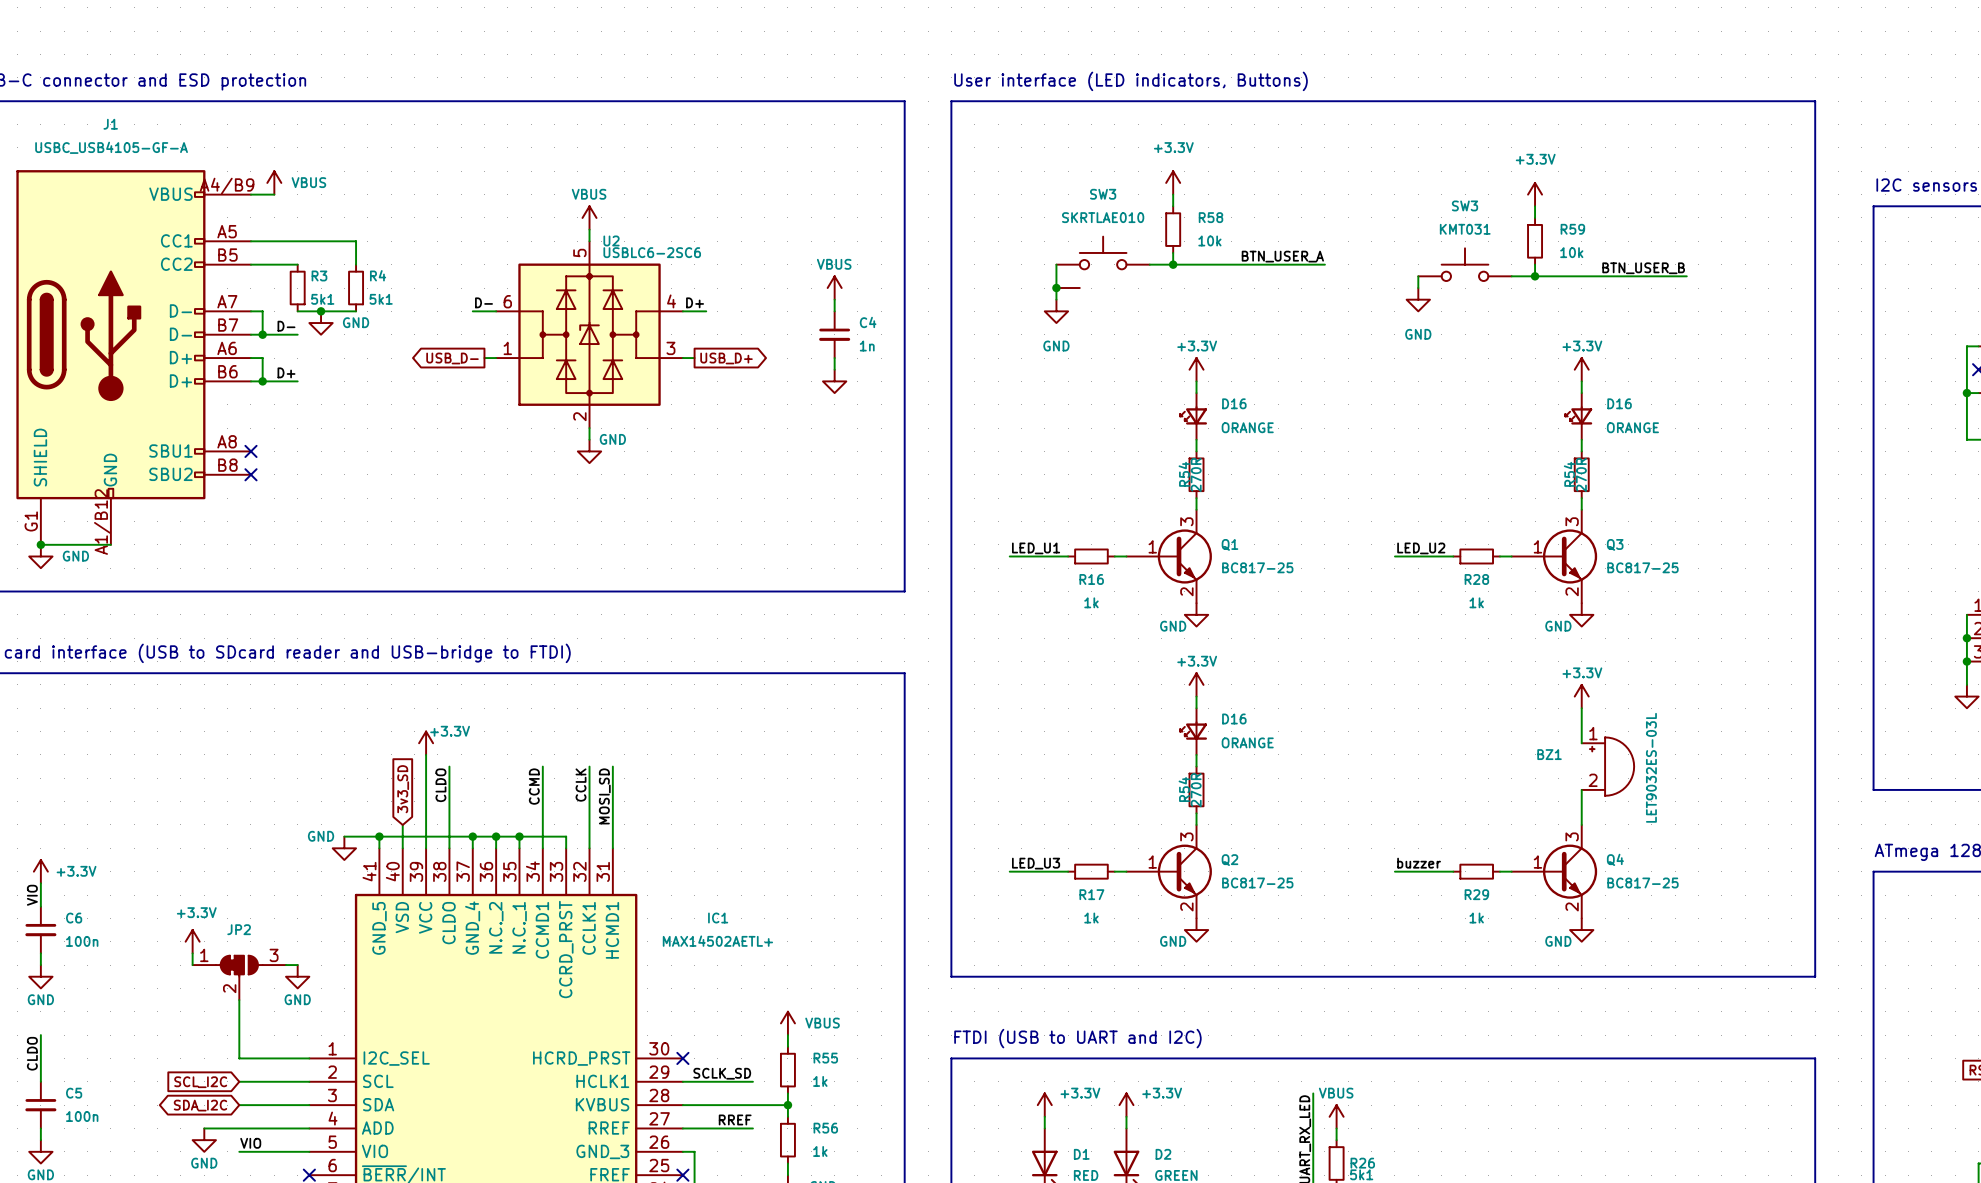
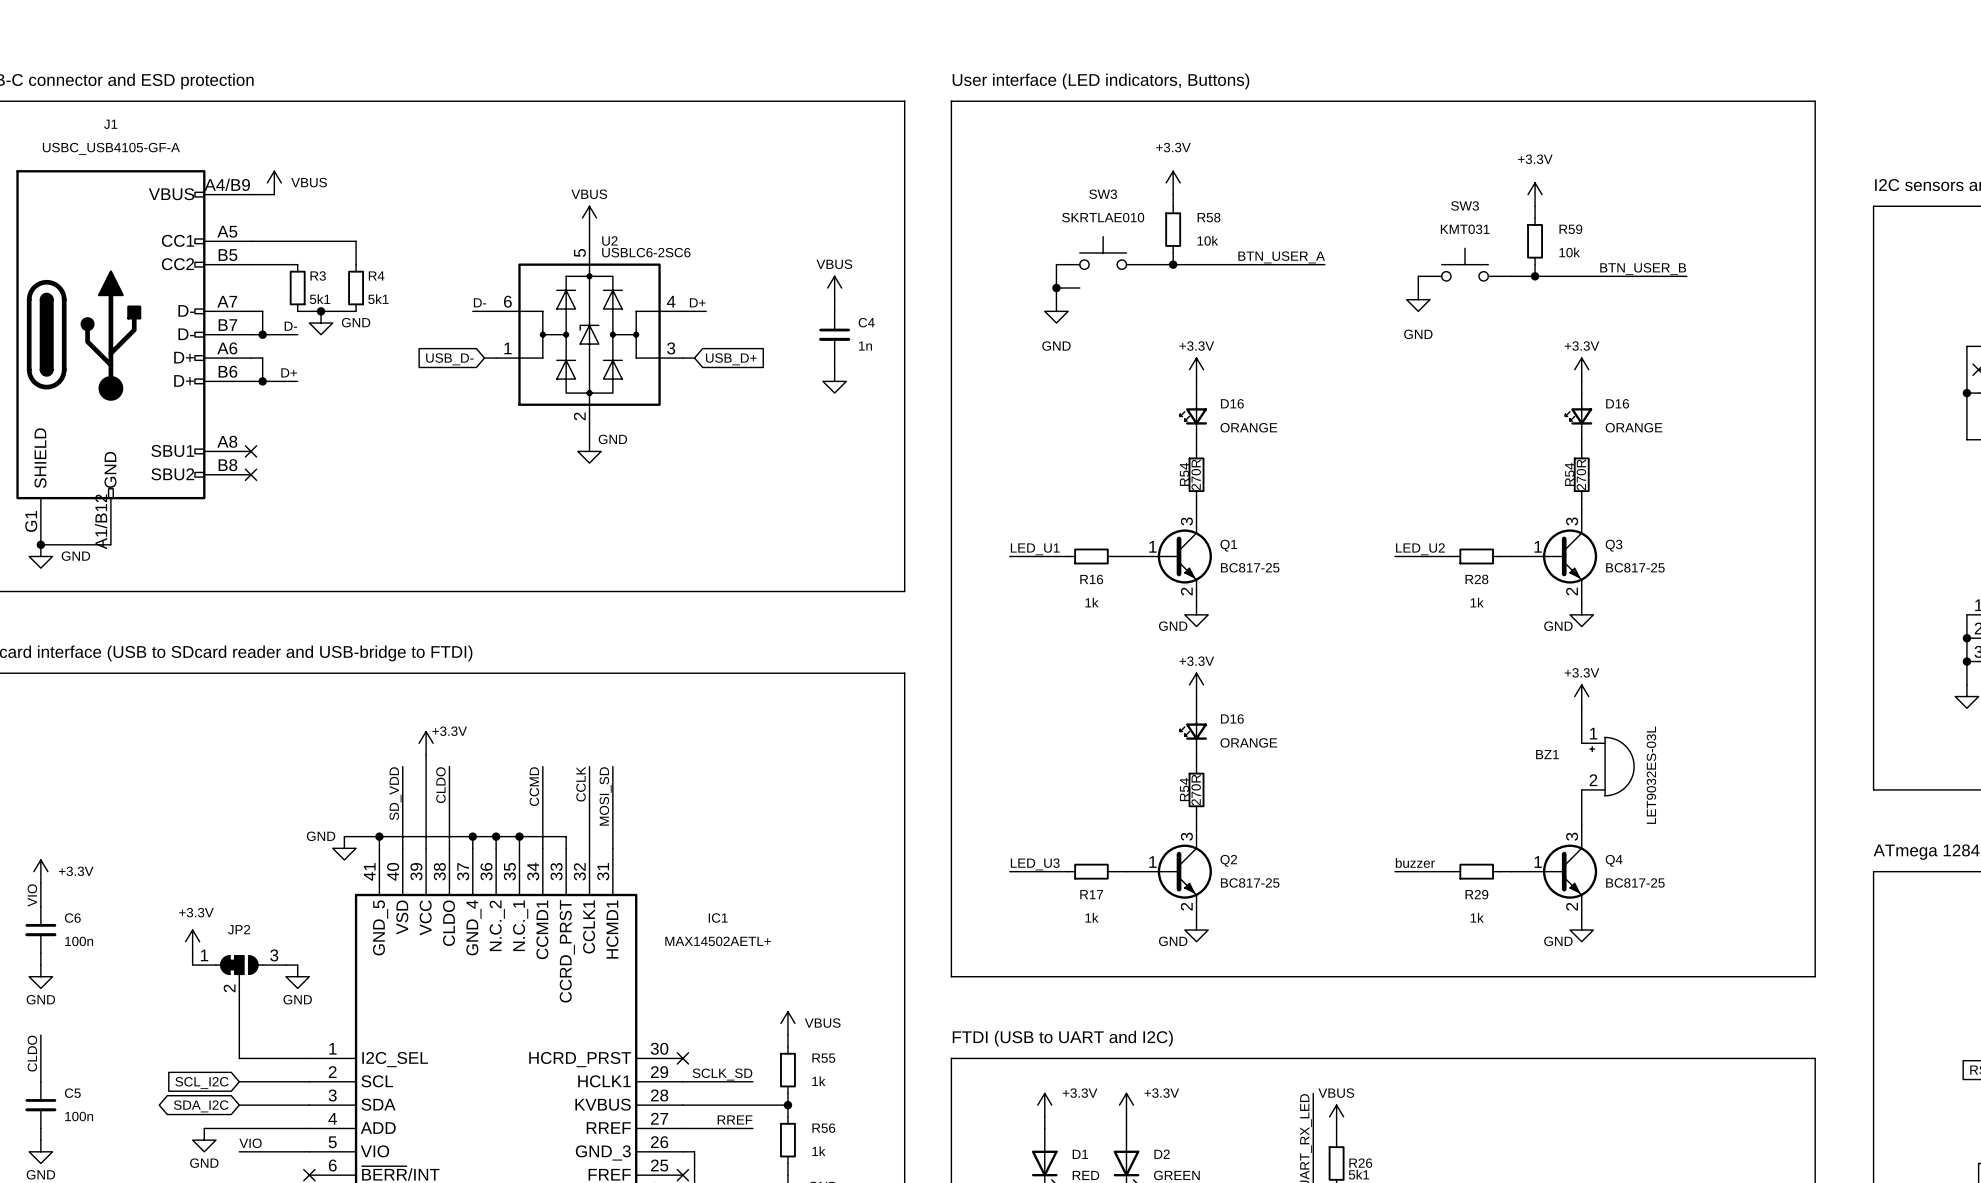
global label shape: output (452, 358) -> input (449, 359)
global label shape: output (726, 358) -> input (731, 359)
wire: none -> (402, 766) (402, 824)
global label: 3v3_SD (403, 789) -> none
label: none -> SD_VDD (395, 793)

